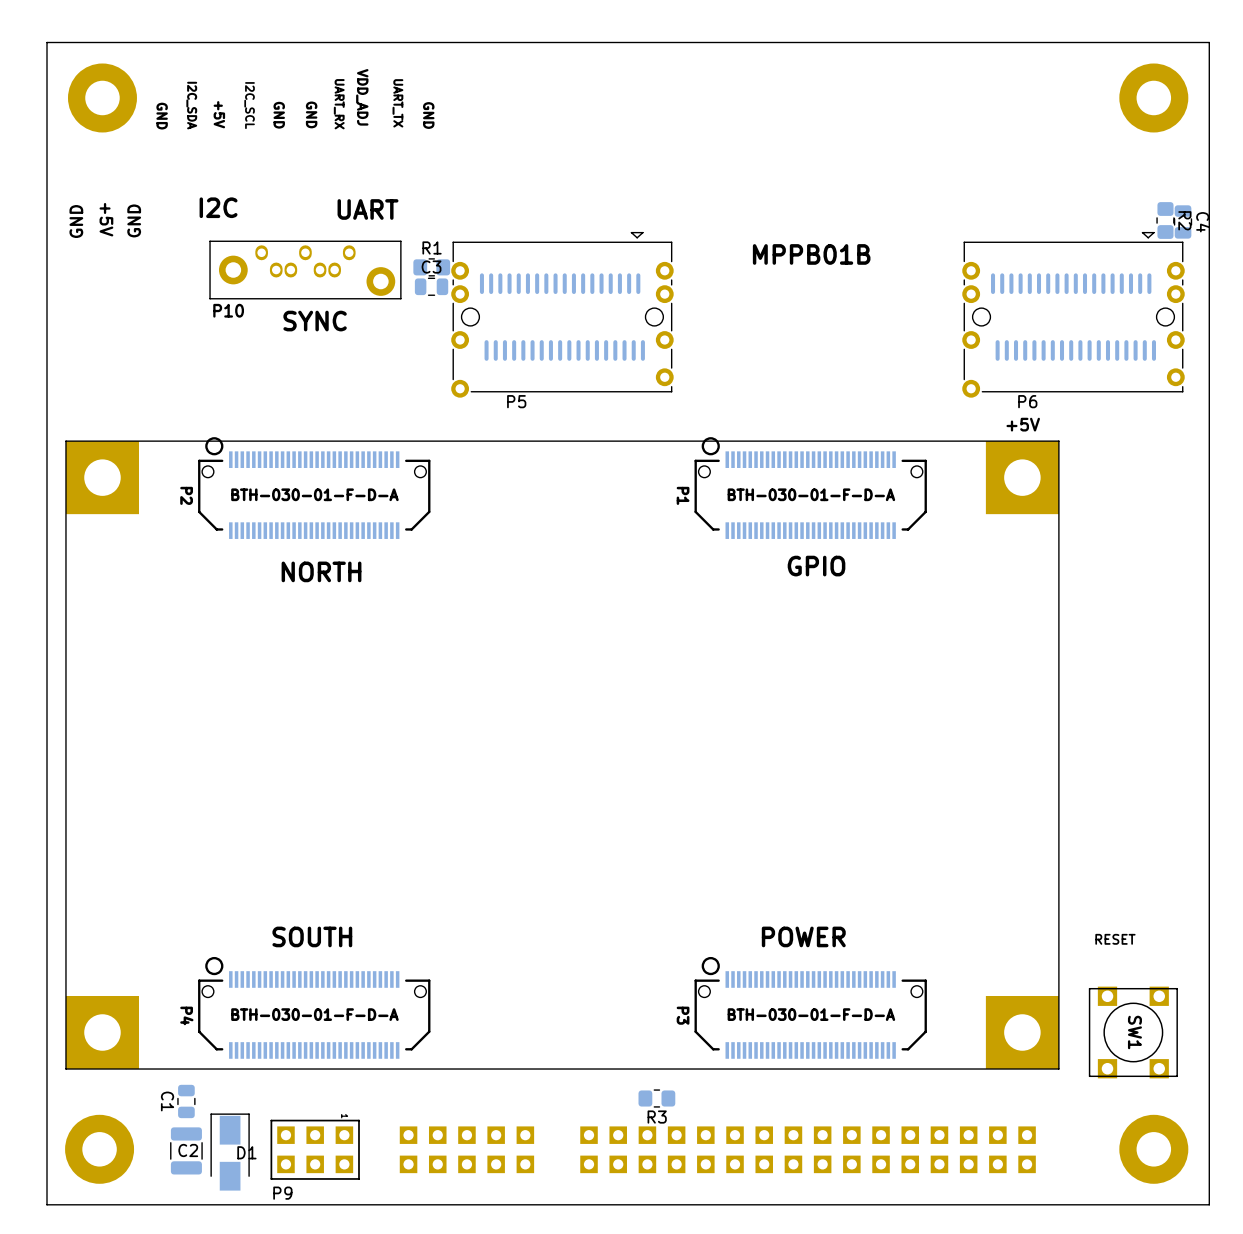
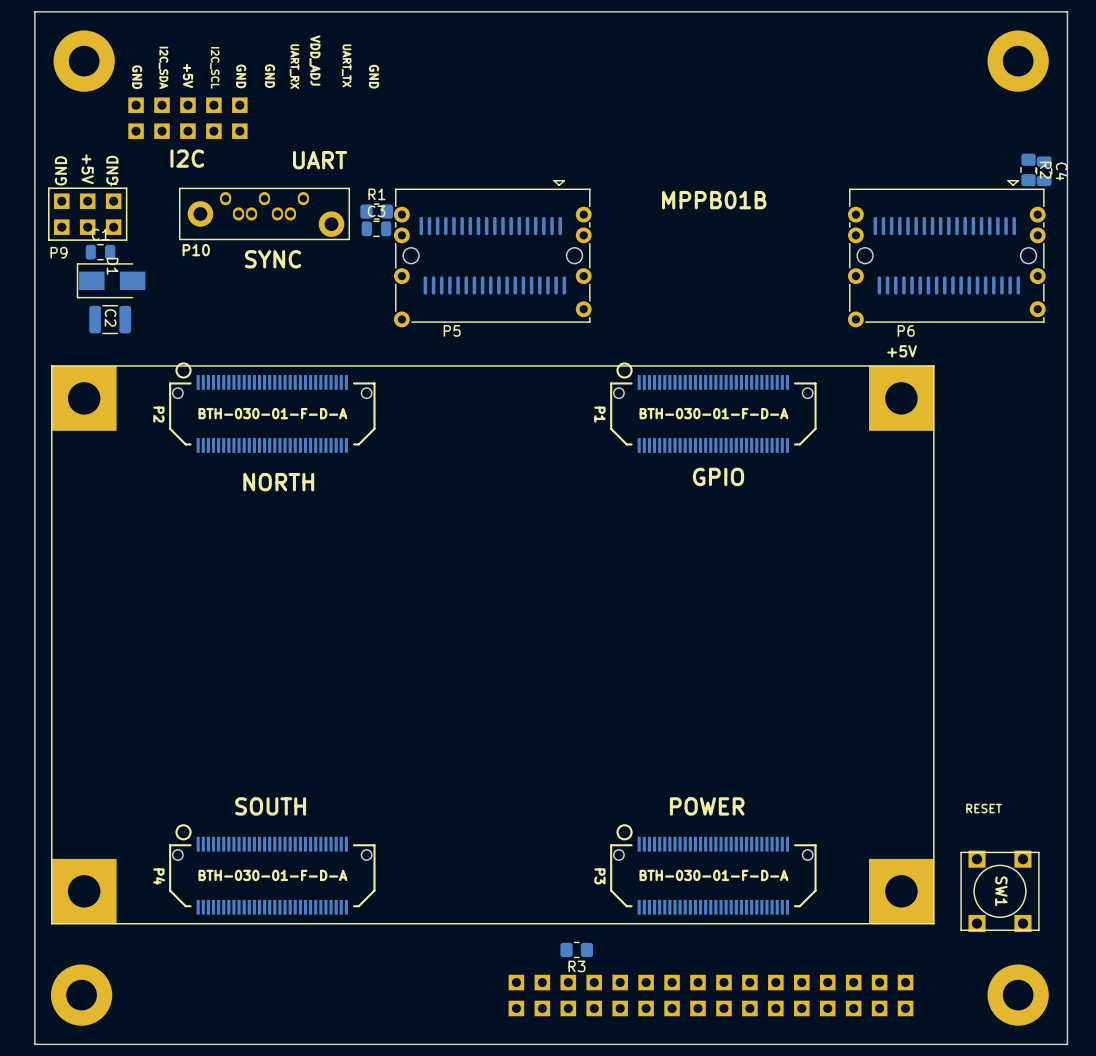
part: none -> (187, 118)
C1 rotation: 0° (186, 1101) -> 90° clockwise (100, 252)
C1 position: (186, 1101) -> (100, 252)
P9 position: (315, 1149) -> (87, 214)
part: (466, 1149) -> none
C2 rotation: 0° (186, 1150) -> 90° clockwise (110, 319)
C2 position: (186, 1150) -> (110, 319)
D1 rotation: 0° (230, 1152) -> 90° counterclockwise (111, 280)
D1 position: (230, 1152) -> (111, 280)

